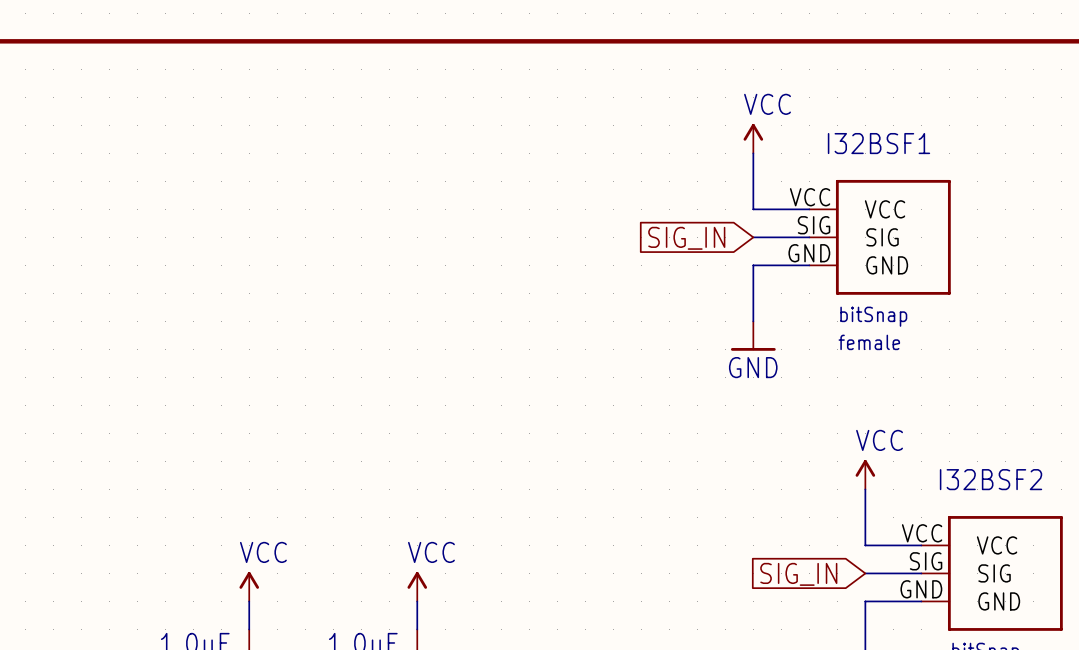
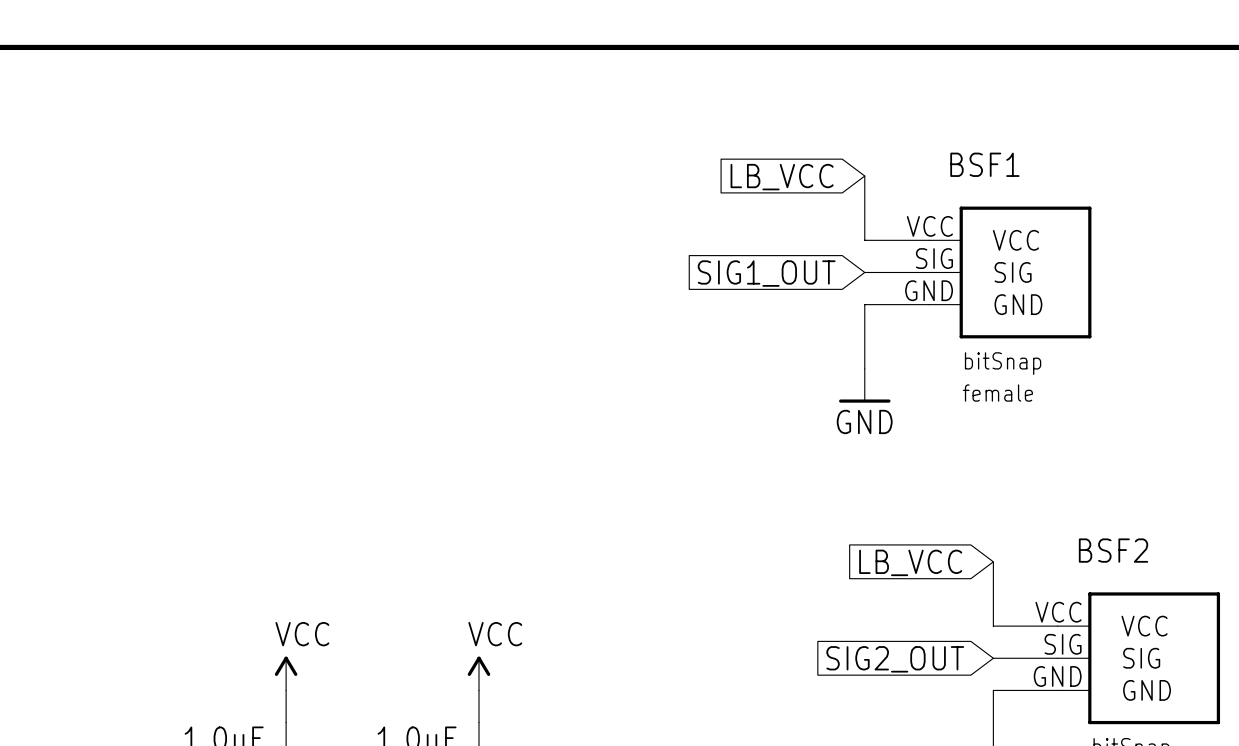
power symbol: VCC (753, 138) -> none
I32BSF1 name: I32BSF1 (879, 143) -> BSF1 (984, 164)
global label: none -> LB_VCC (782, 177)
global label: SIG_IN (686, 238) -> SIG1_OUT (766, 273)
power symbol: VCC (865, 474) -> none
I32BSF2 name: I32BSF2 (991, 479) -> BSF2 (1113, 550)
global label: none -> LB_VCC (910, 562)
global label: SIG_IN (798, 574) -> SIG2_OUT (895, 659)

